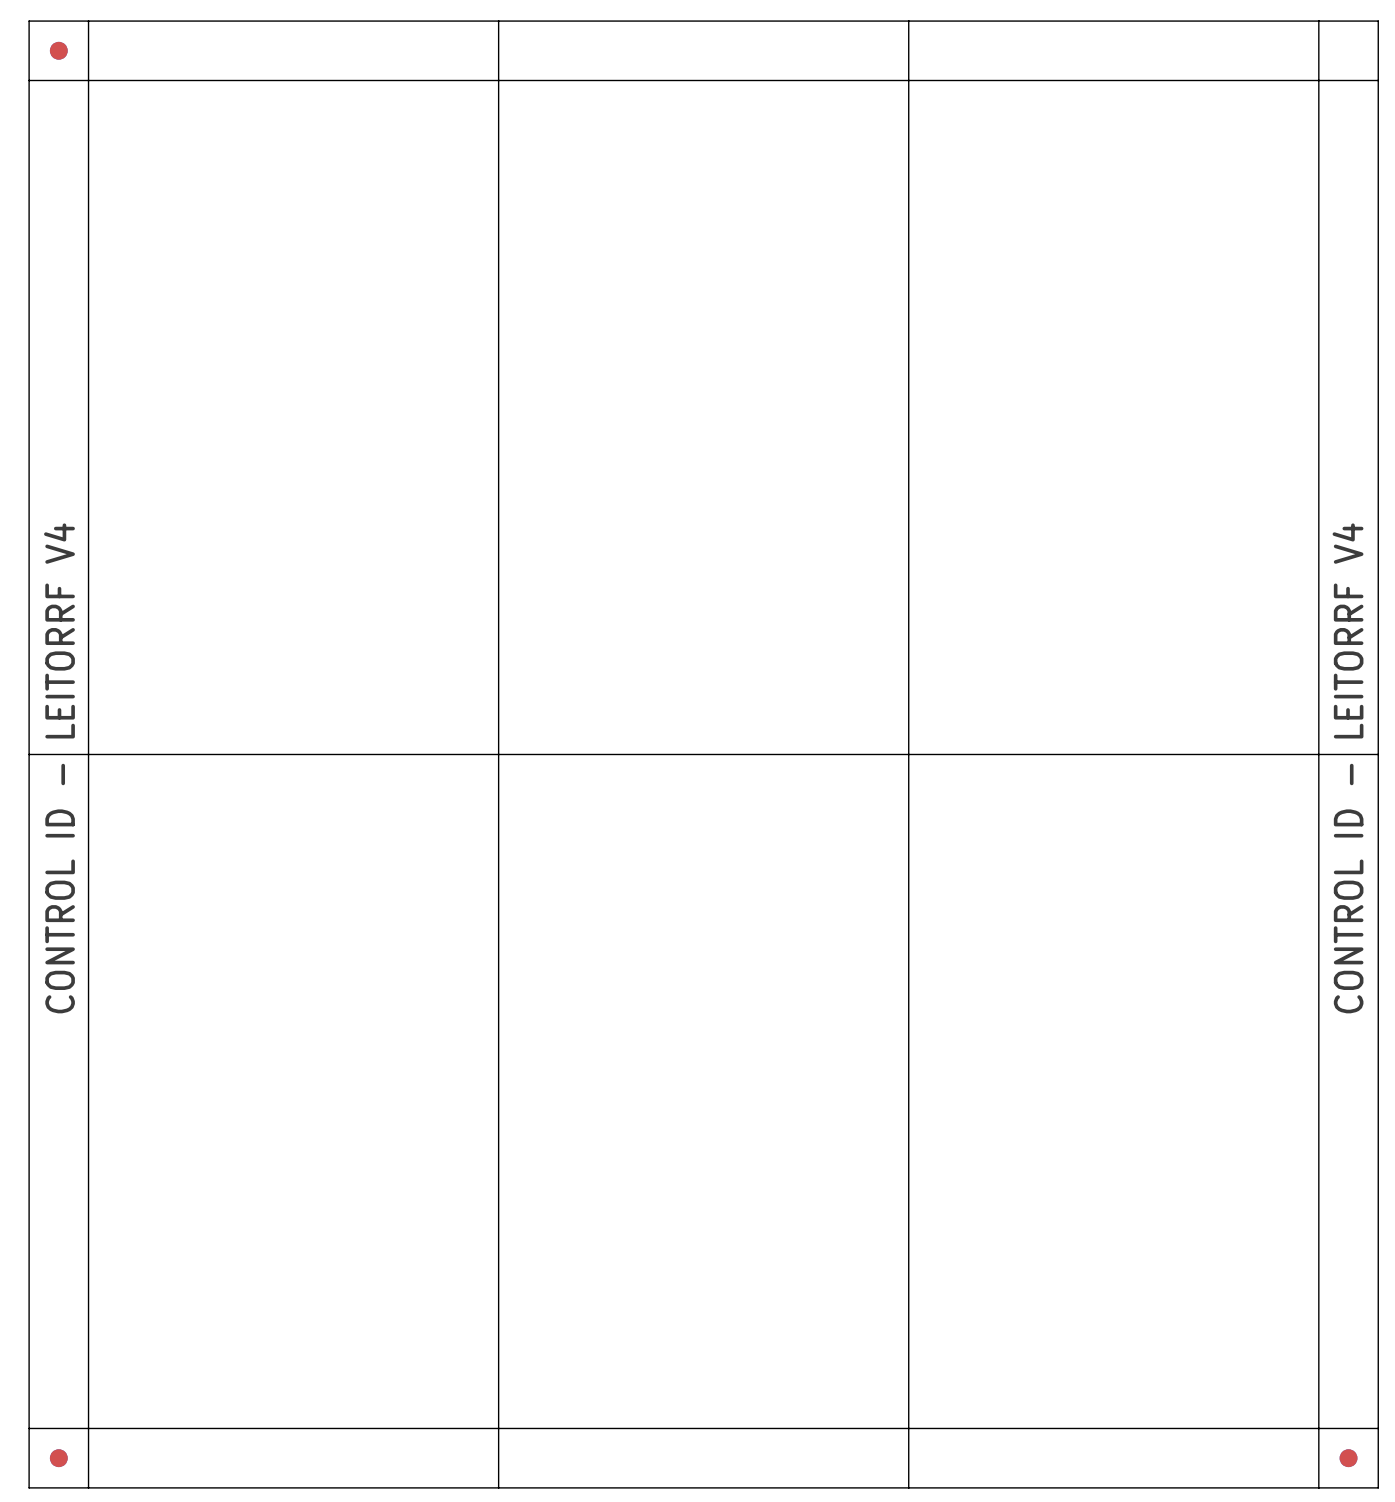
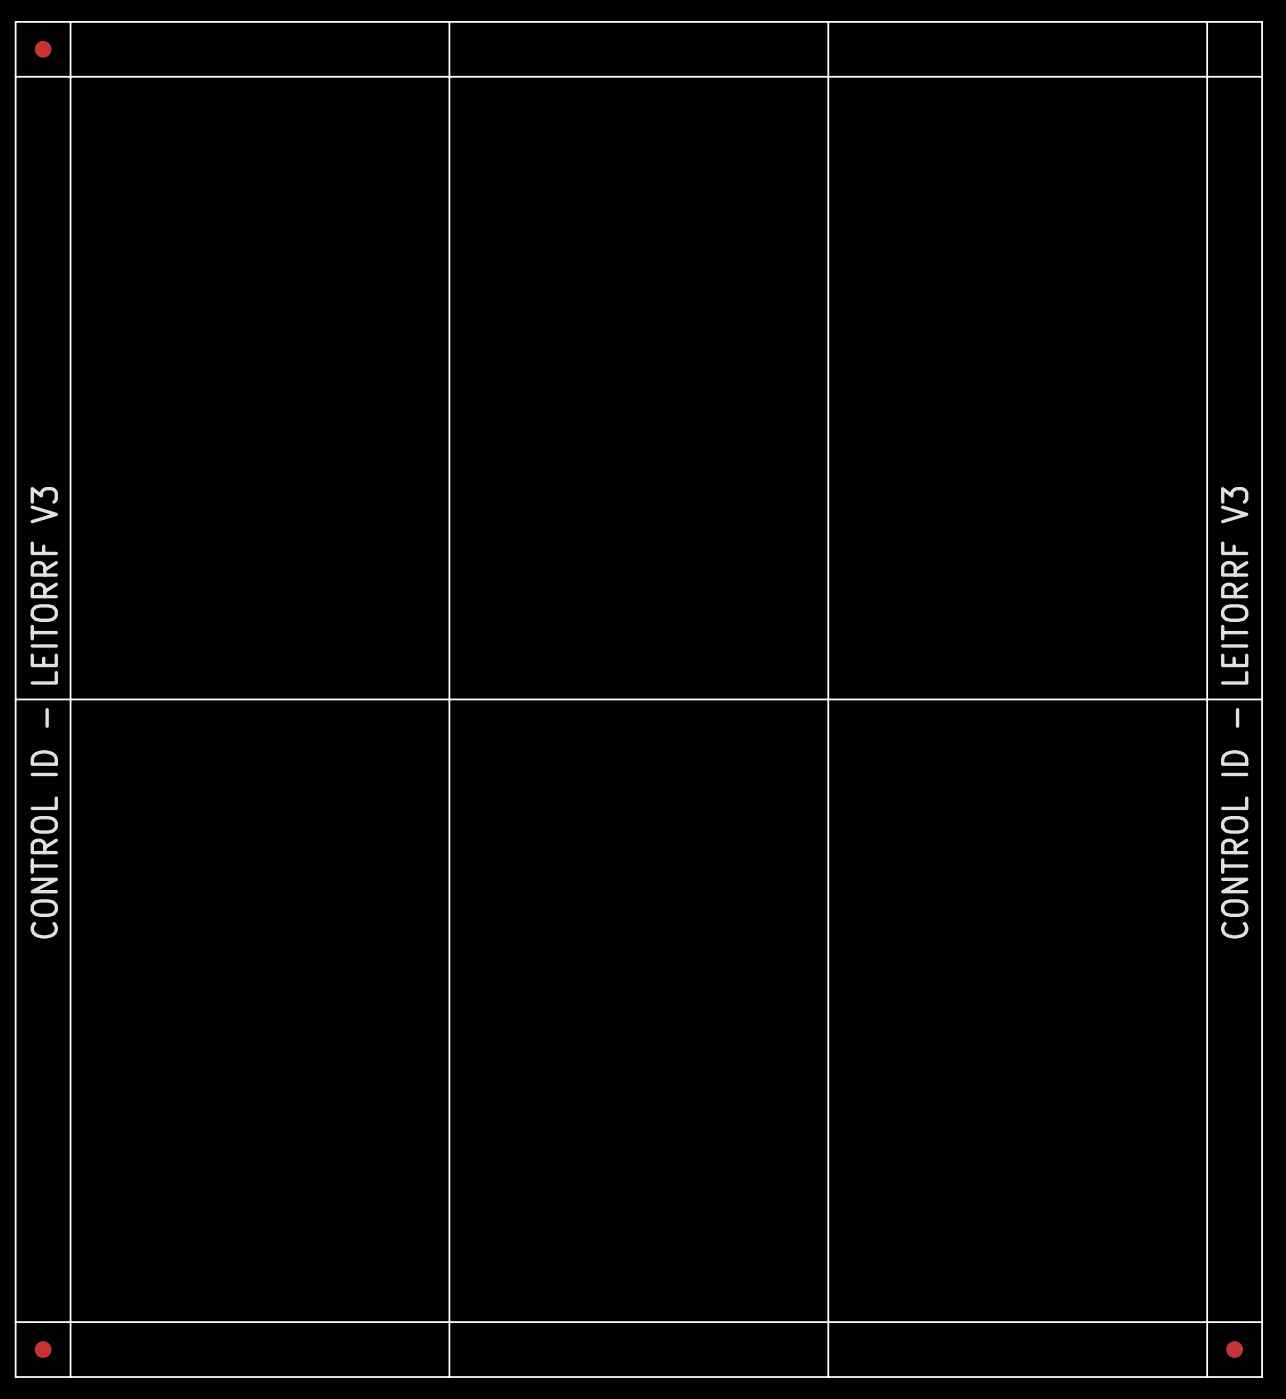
text: CONTROL ID - LEITORRF V4 (59, 768) -> CONTROL ID - LEITORRF V3 (44, 712)
text: CONTROL ID - LEITORRF V4 (1348, 768) -> CONTROL ID - LEITORRF V3 (1234, 712)

